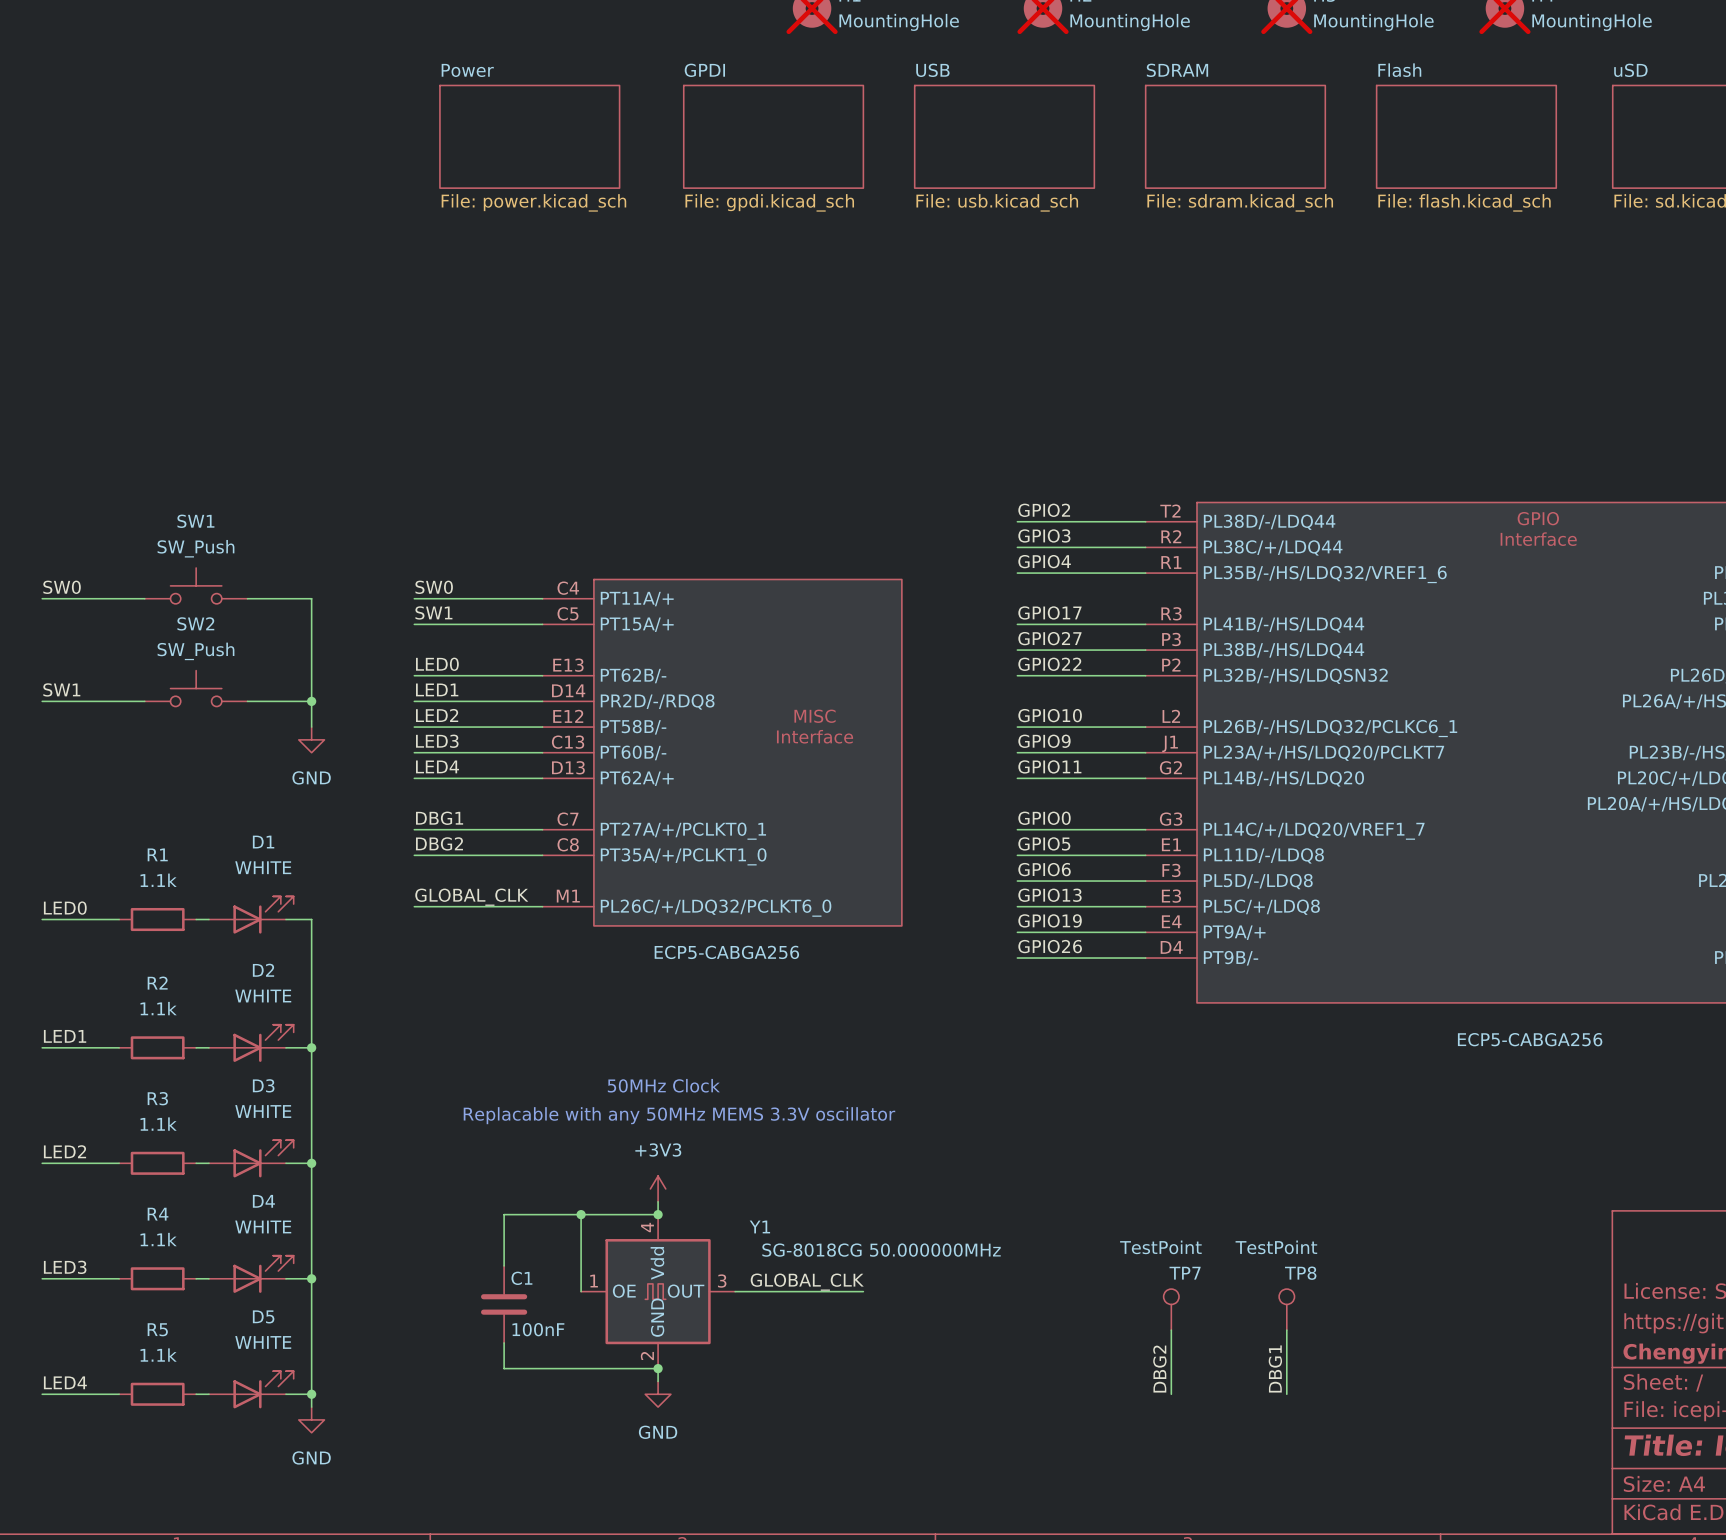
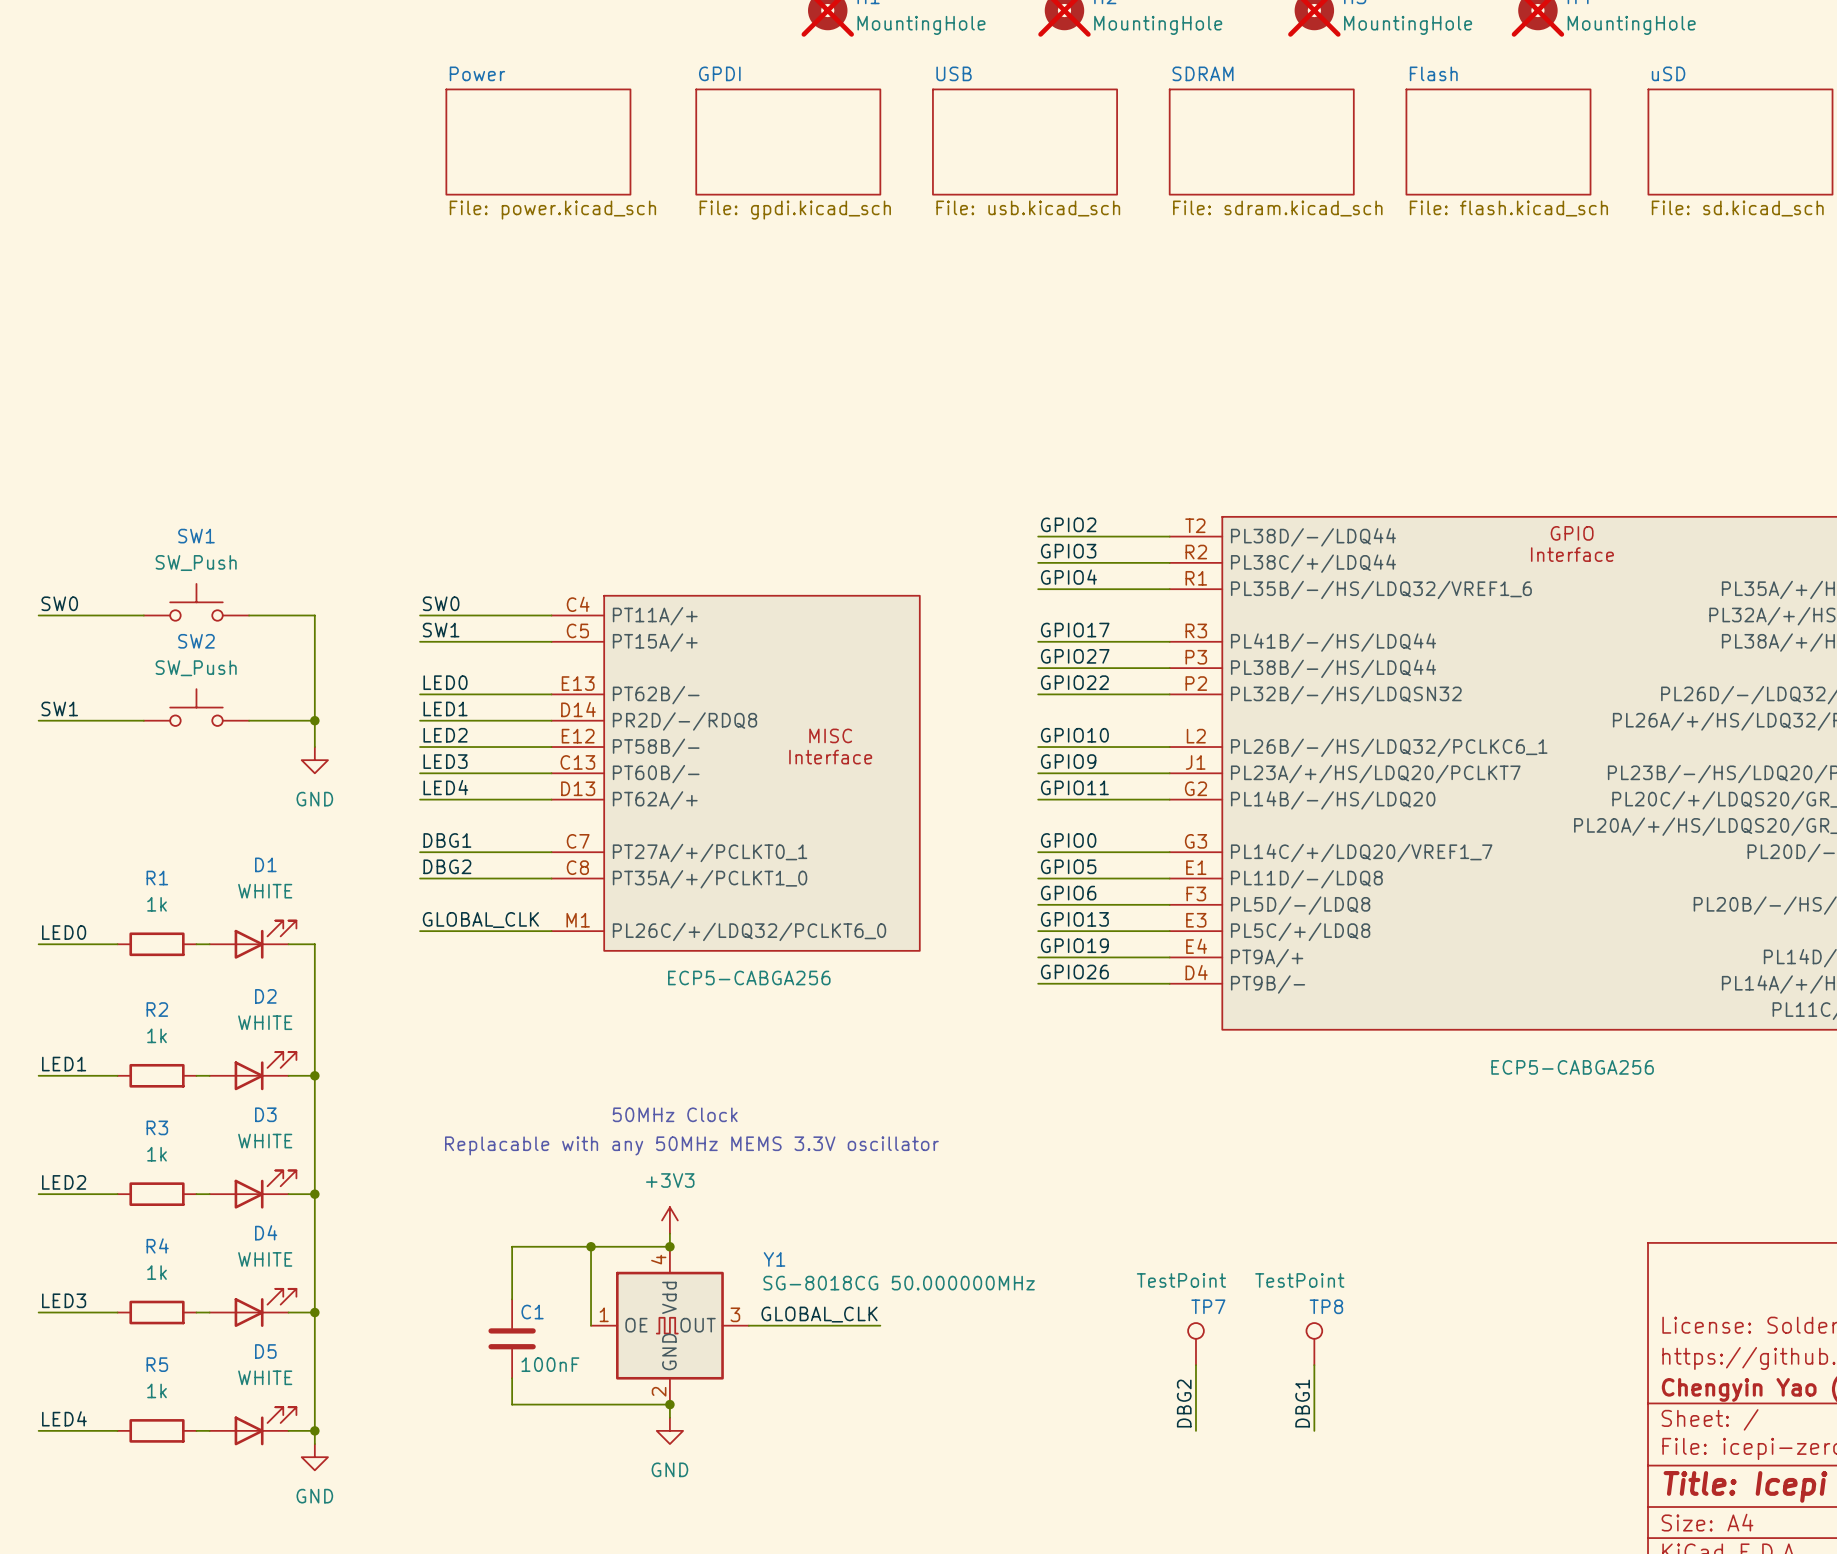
R1 value: 1.1k (158, 880) -> 1k (157, 904)
R2 value: 1.1k (158, 1008) -> 1k (157, 1035)
R3 value: 1.1k (158, 1124) -> 1k (157, 1154)
R4 value: 1.1k (158, 1239) -> 1k (157, 1272)
R5 value: 1.1k (158, 1355) -> 1k (157, 1390)

